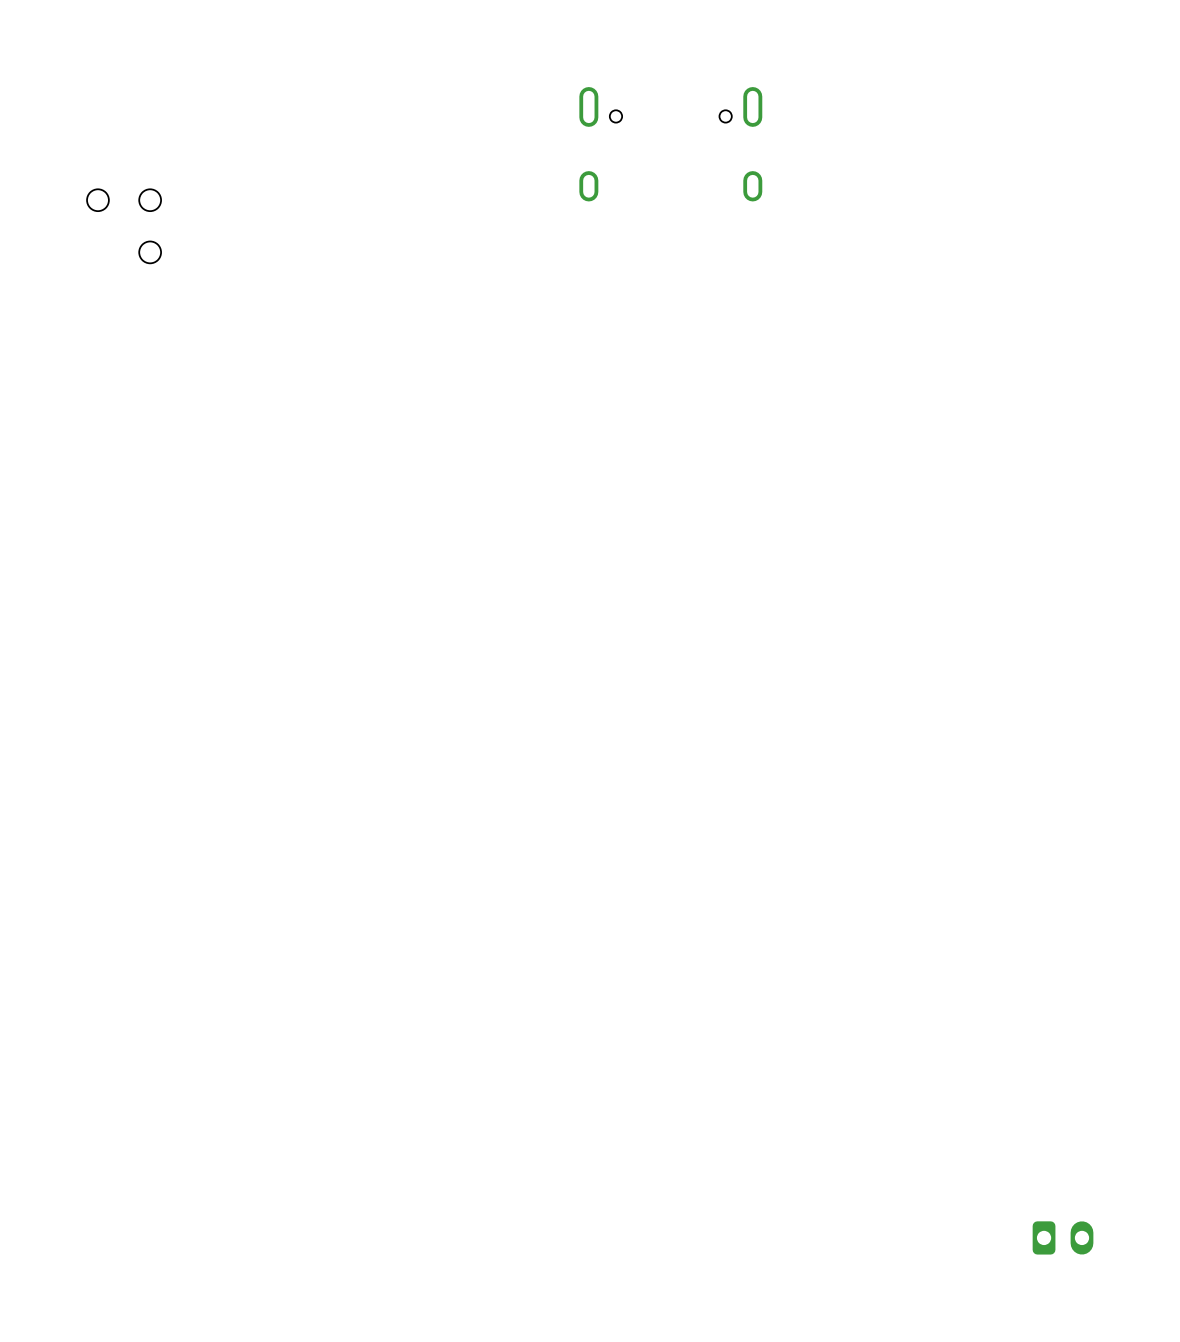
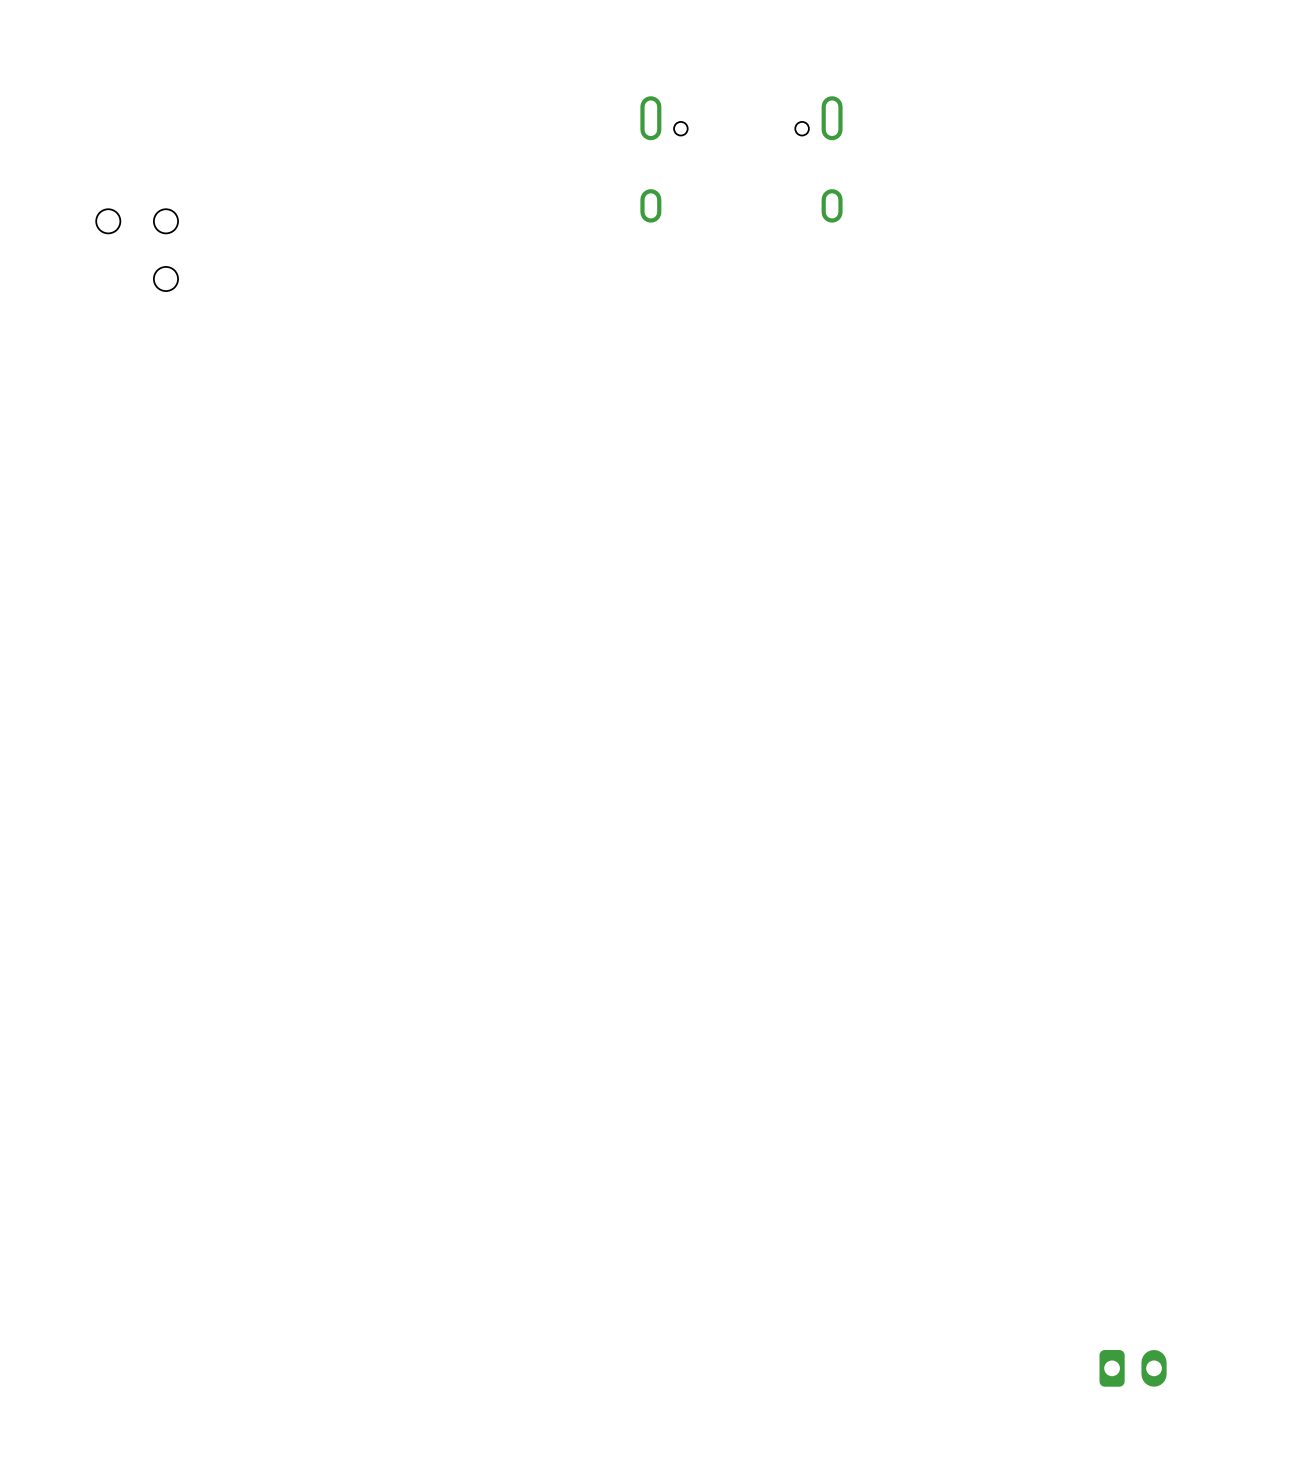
part position: (1063, 1237) -> (1133, 1368)

